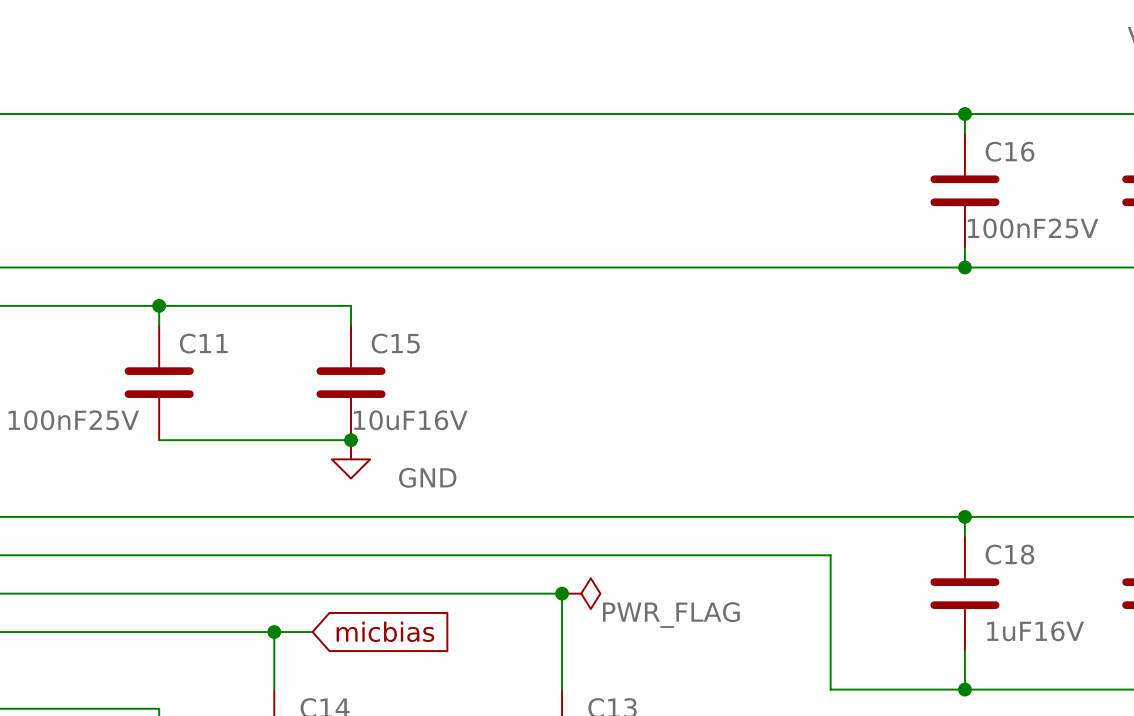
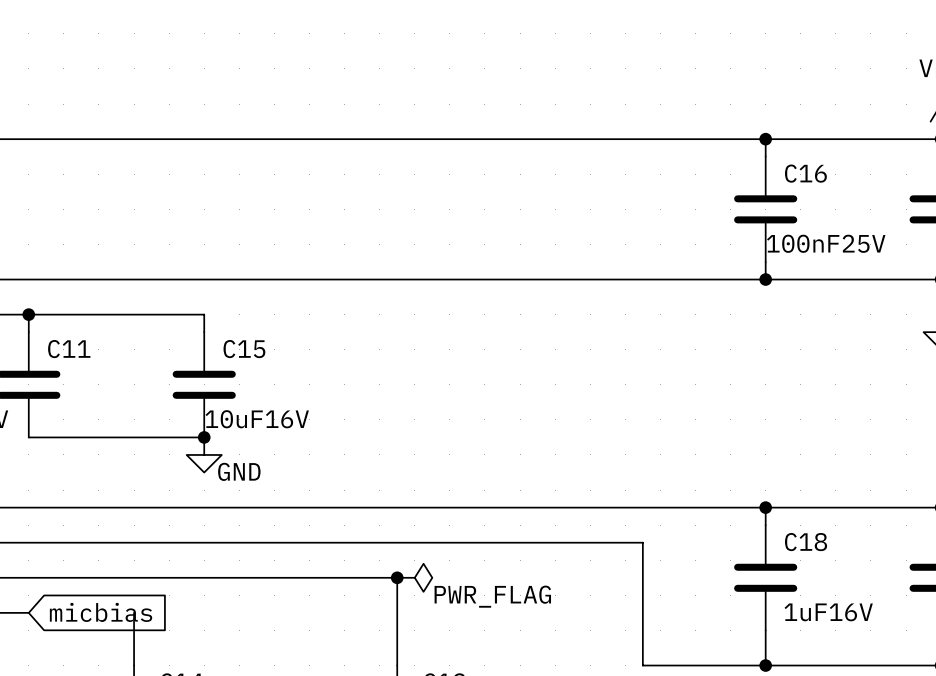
power symbol text position: GND (427, 477) -> GND (239, 471)
global label position: micbias (385, 631) -> micbias (101, 612)
wire: (159, 632) (312, 632) -> none
junction: (274, 632) -> none

